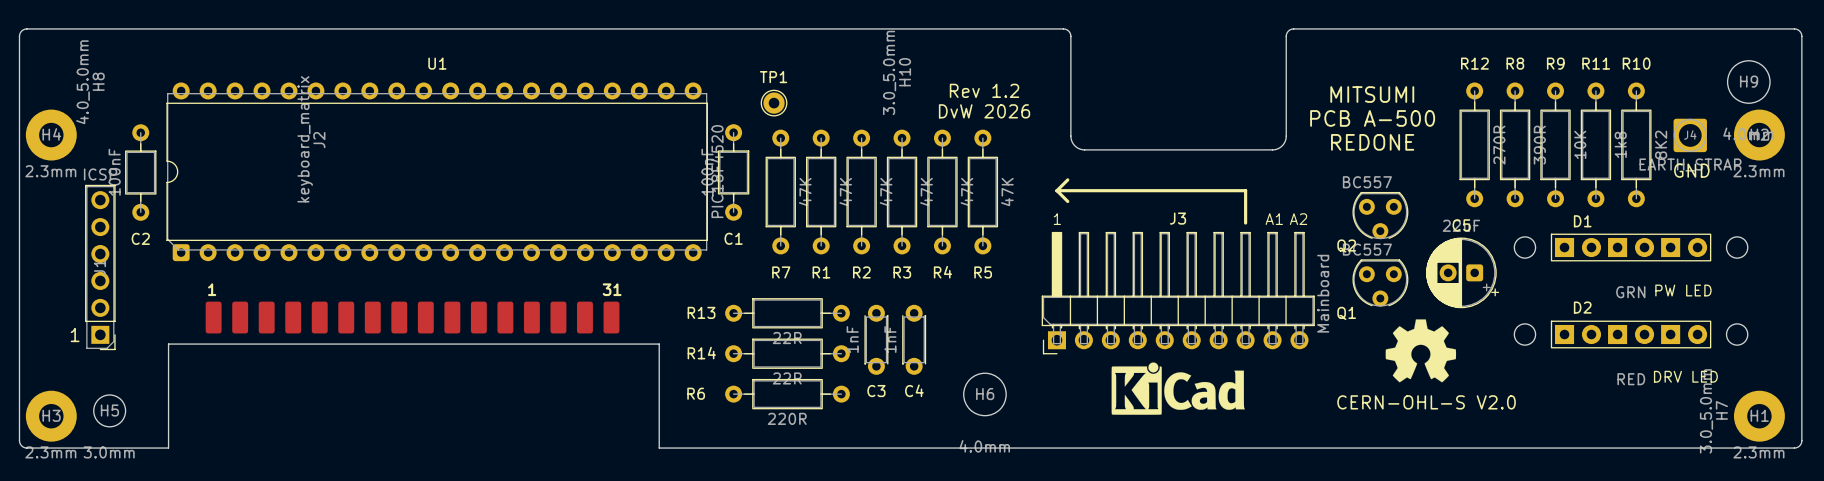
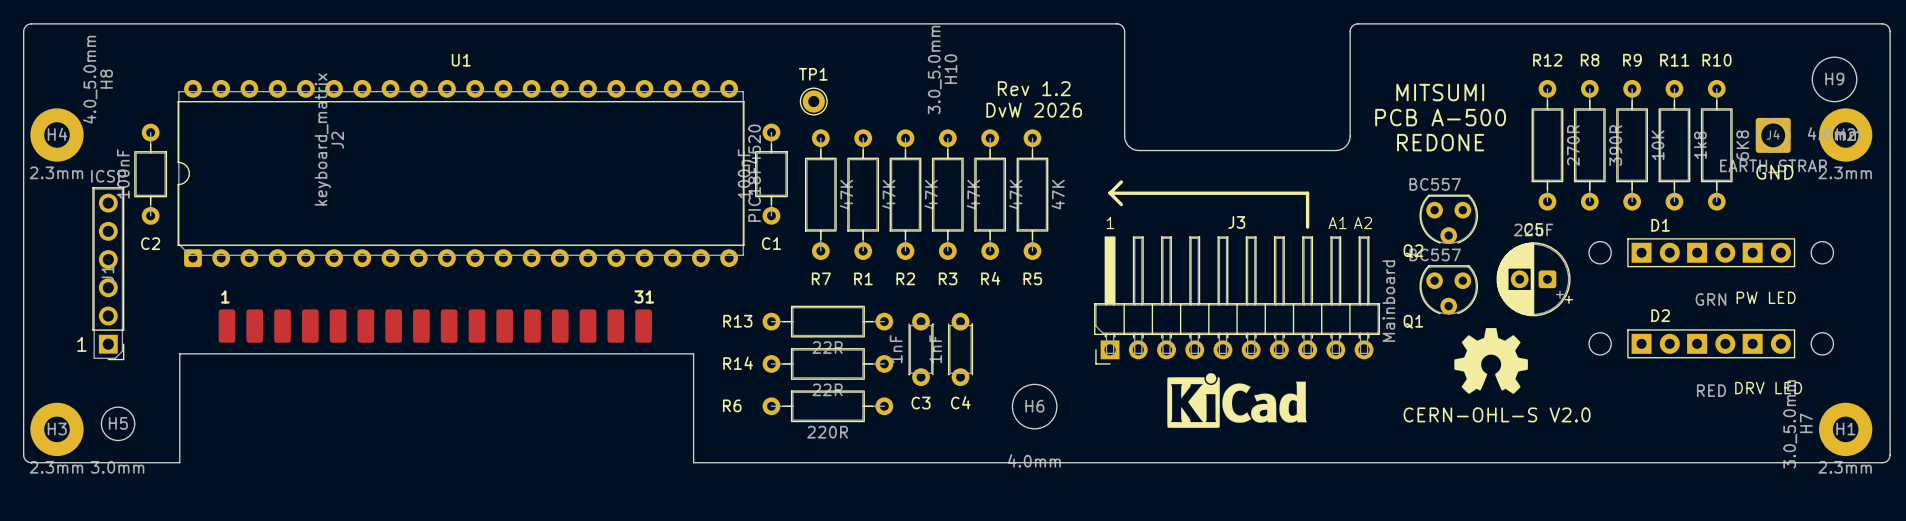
R10 value: 8K2 (1661, 144) -> 6K8 (1742, 145)

